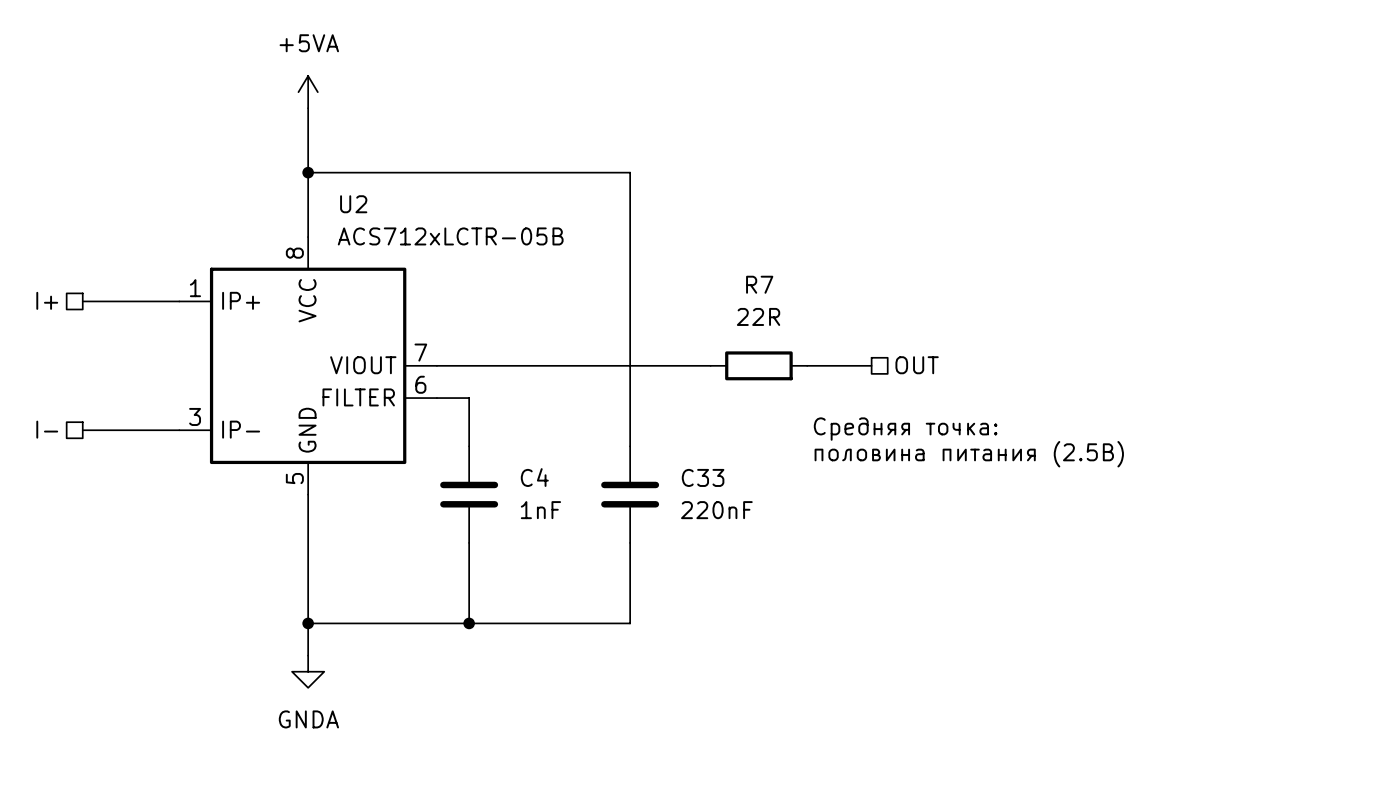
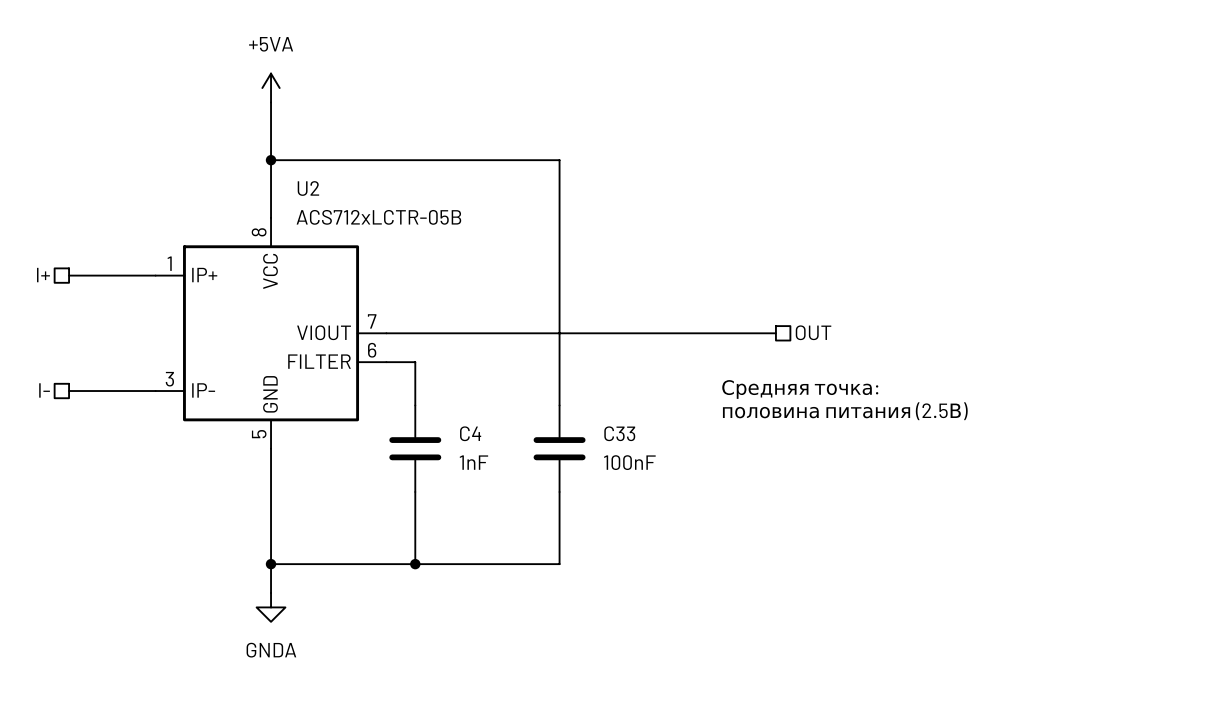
wire: none -> (631, 333) (718, 333)
R7: 22R (758, 365) -> none
C33 value: 220nF (716, 510) -> 100nF (629, 462)

